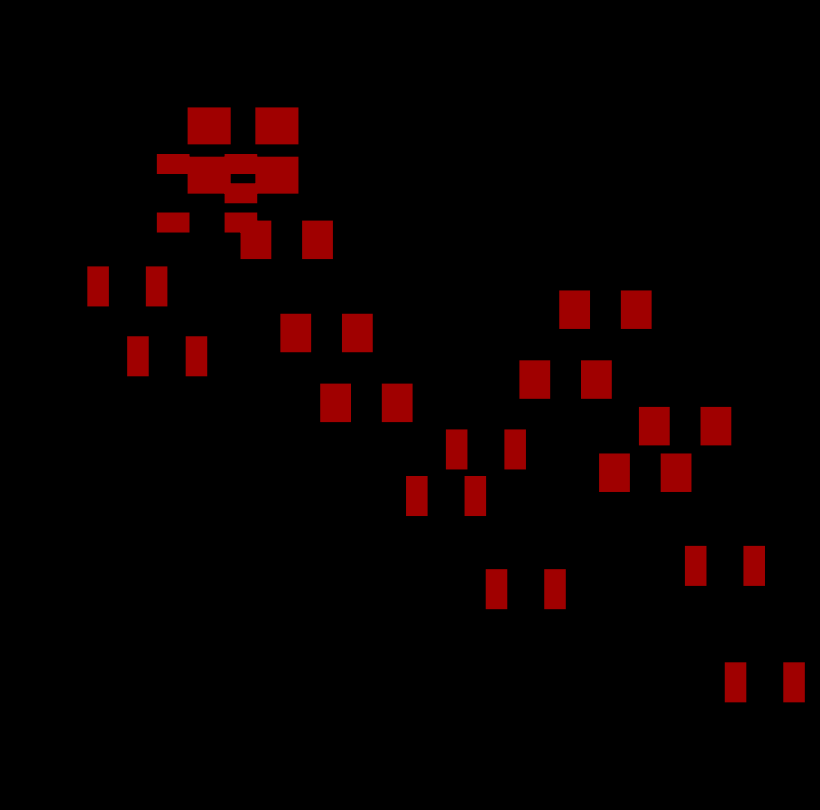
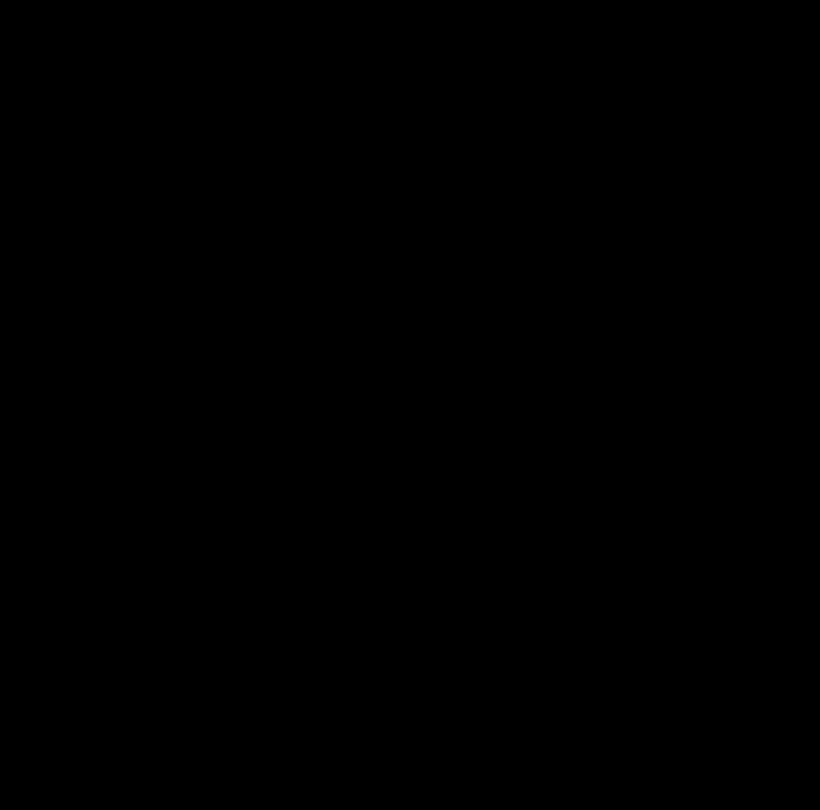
part: (243, 150) -> none
part: (207, 193) -> none
part: (286, 239) -> none
part: (127, 286) -> none
part: (605, 309) -> none
part: (326, 332) -> none
part: (167, 356) -> none
part: (565, 379) -> none
part: (366, 402) -> none
part: (685, 426) -> none
part: (485, 449) -> none
part: (645, 472) -> none
part: (446, 496) -> none
part: (724, 565) -> none
part: (525, 589) -> none
part: (764, 682) -> none

